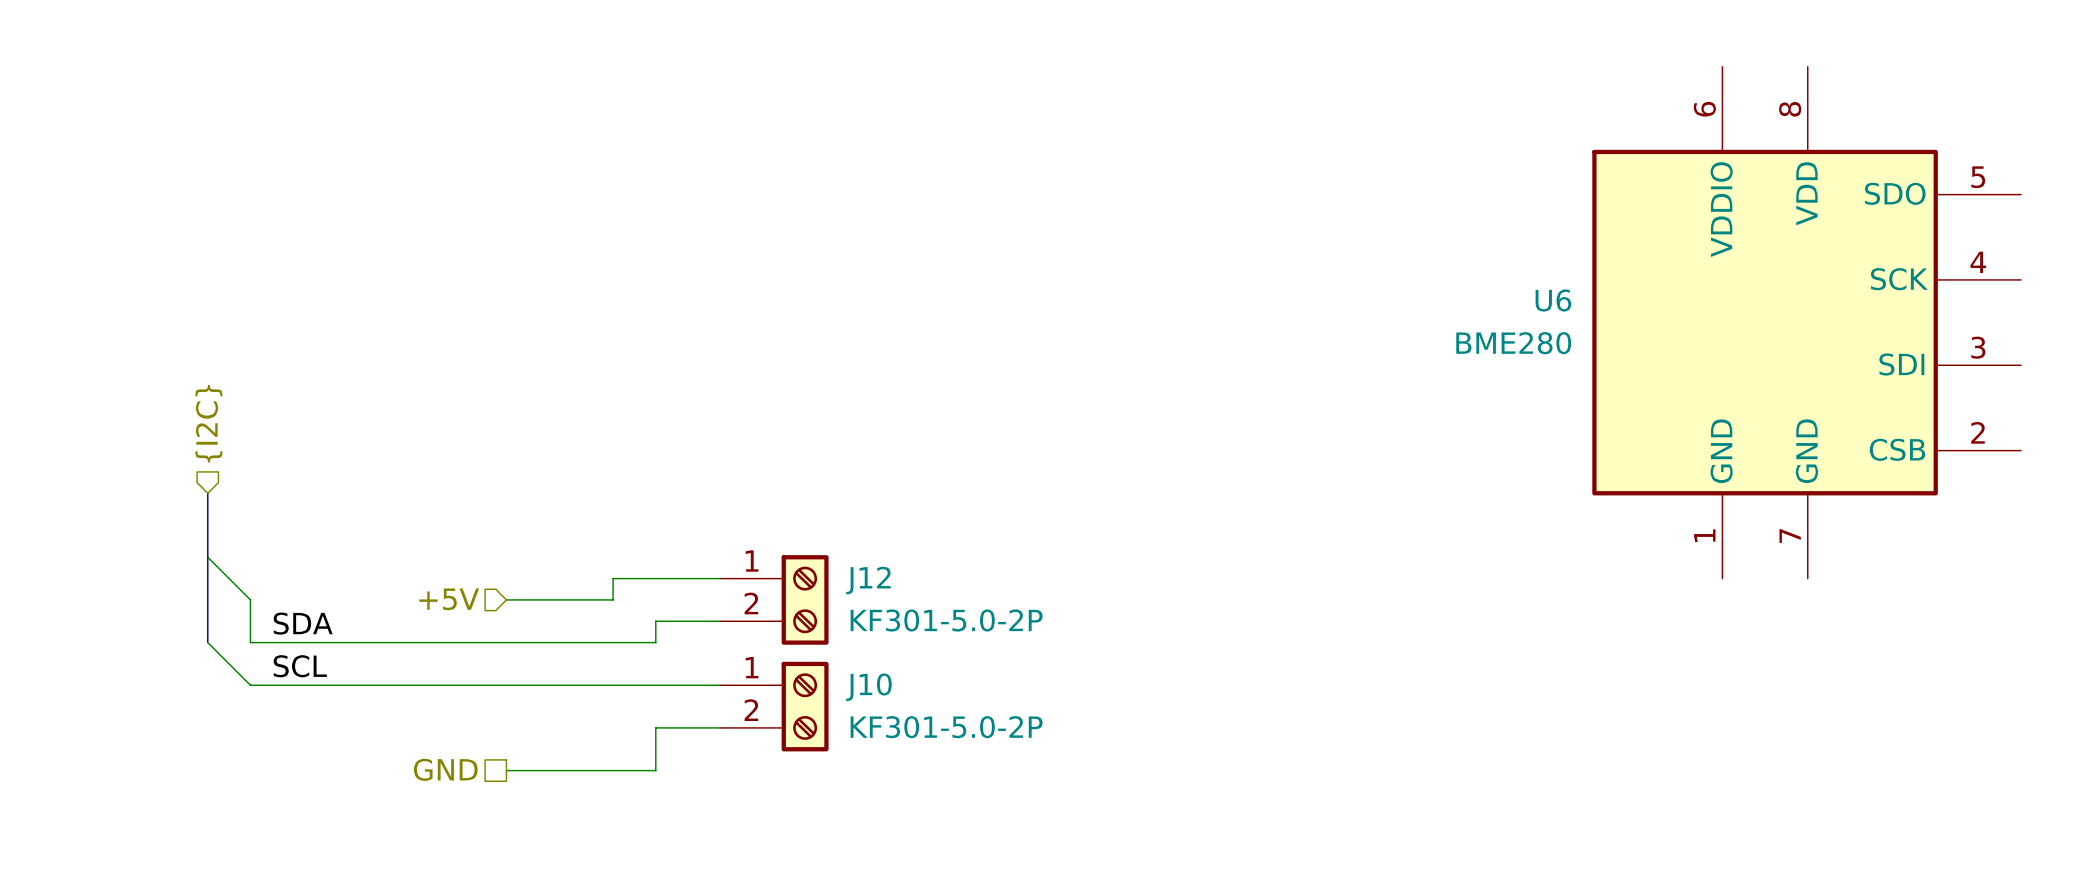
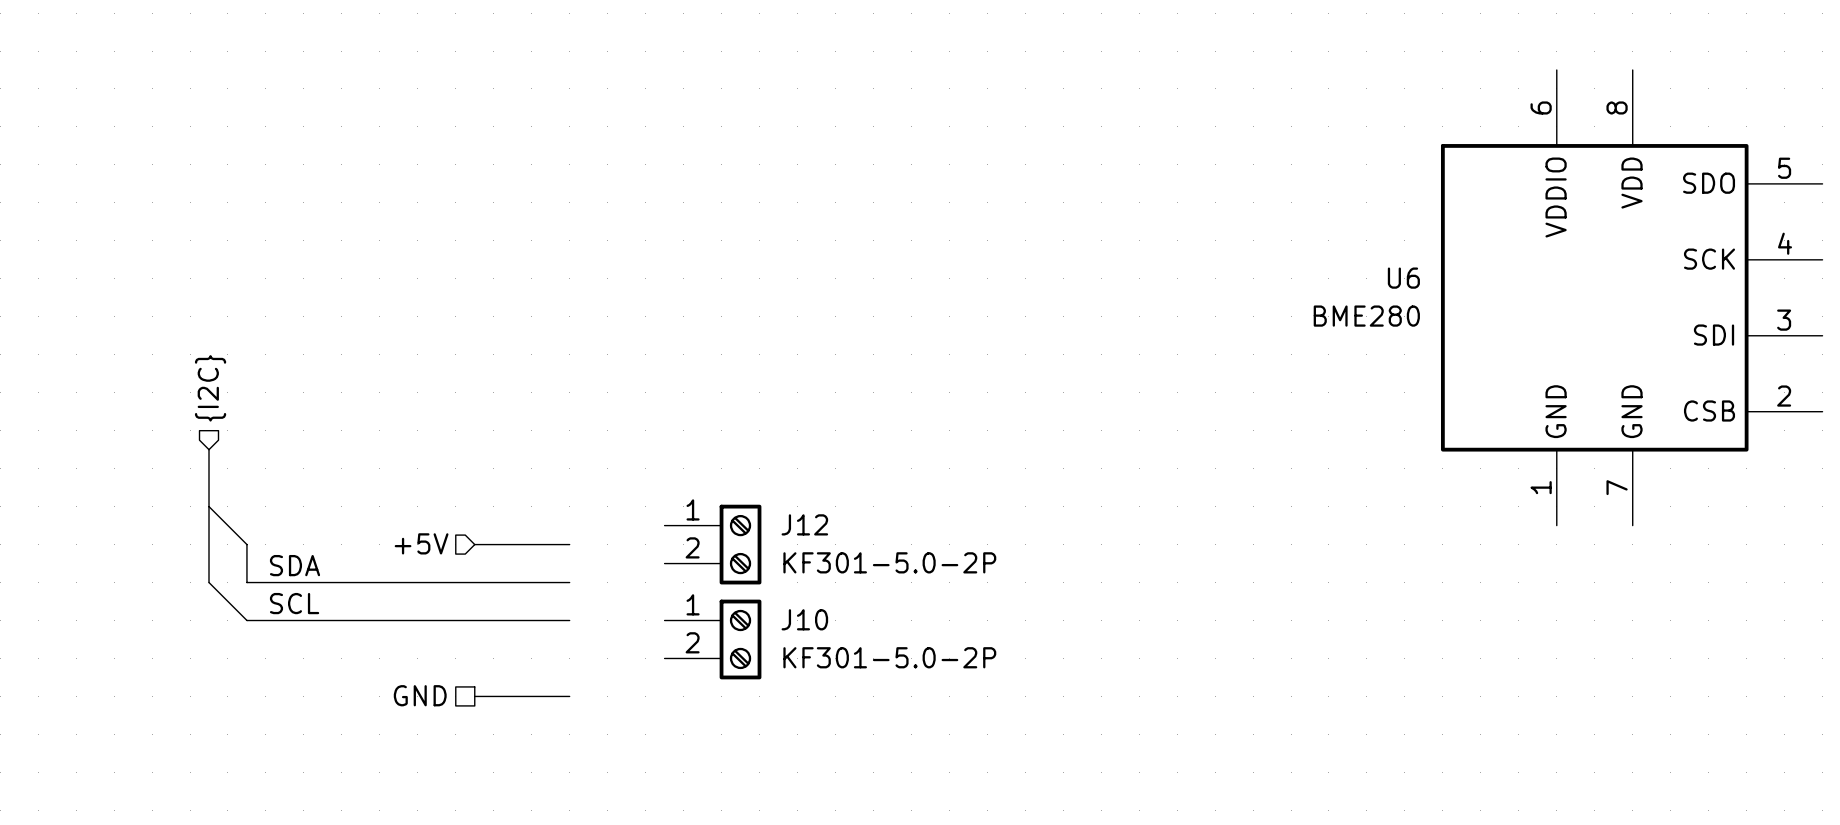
wire: (719, 578) (613, 578) (613, 599) -> none
wire: (719, 621) (655, 621) (655, 642) (613, 642) -> none
wire: (613, 685) (719, 685) -> none
wire: (719, 727) (655, 727) (655, 770) (613, 770) -> none

